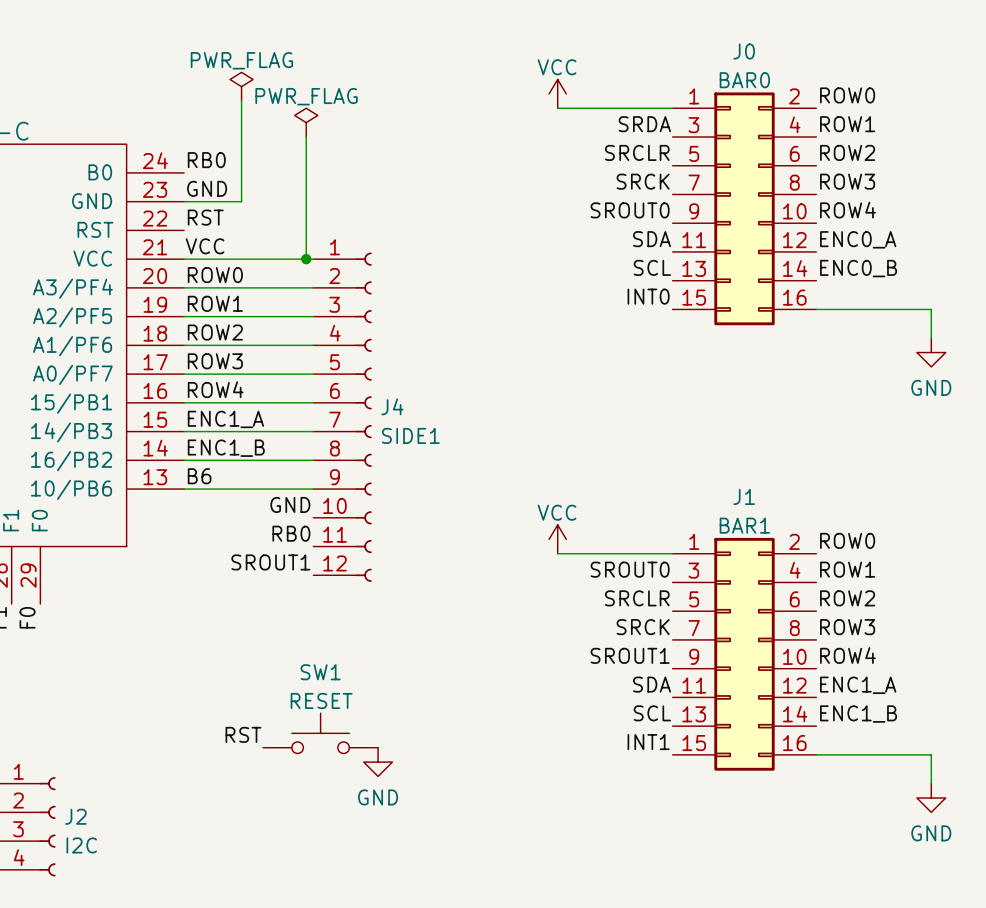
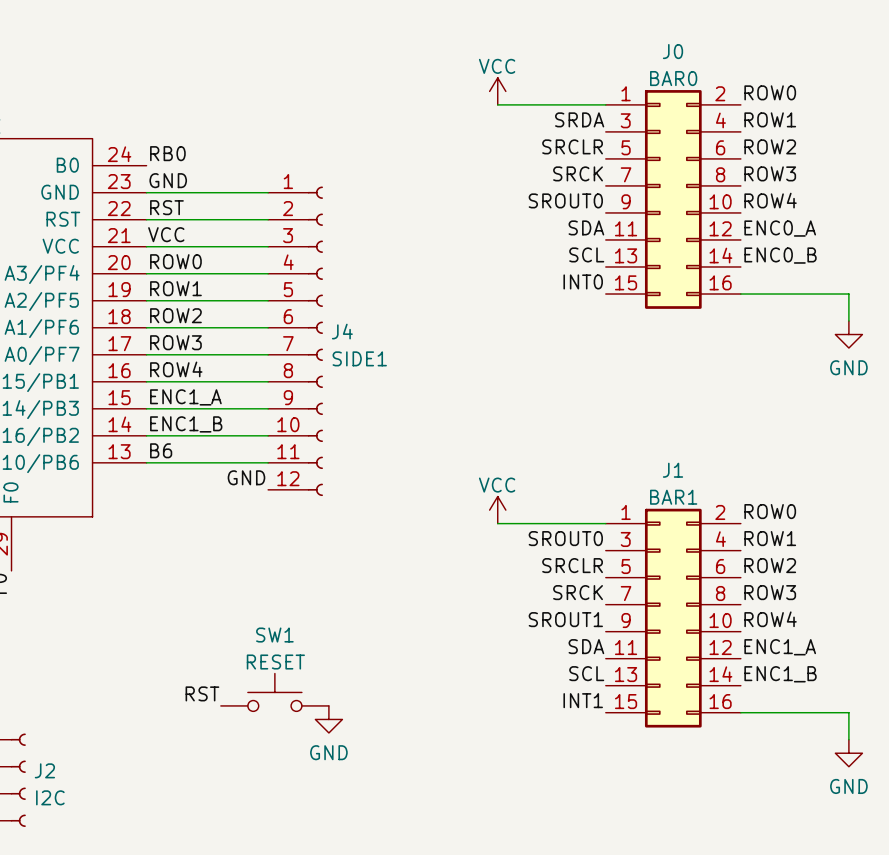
power symbol: PWR_FLAG (241, 86) -> none
wire: (241, 101) (241, 201) -> (268, 192) (200, 192)
power symbol: PWR_FLAG (306, 122) -> none
wire: (306, 137) (306, 259) -> none
wire: none -> (146, 219) (268, 219)
junction: (306, 259) -> none
J4 position: (342, 417) -> (295, 341)
label: RB0 (291, 533) -> none
label: SROUT1 (270, 562) -> none

